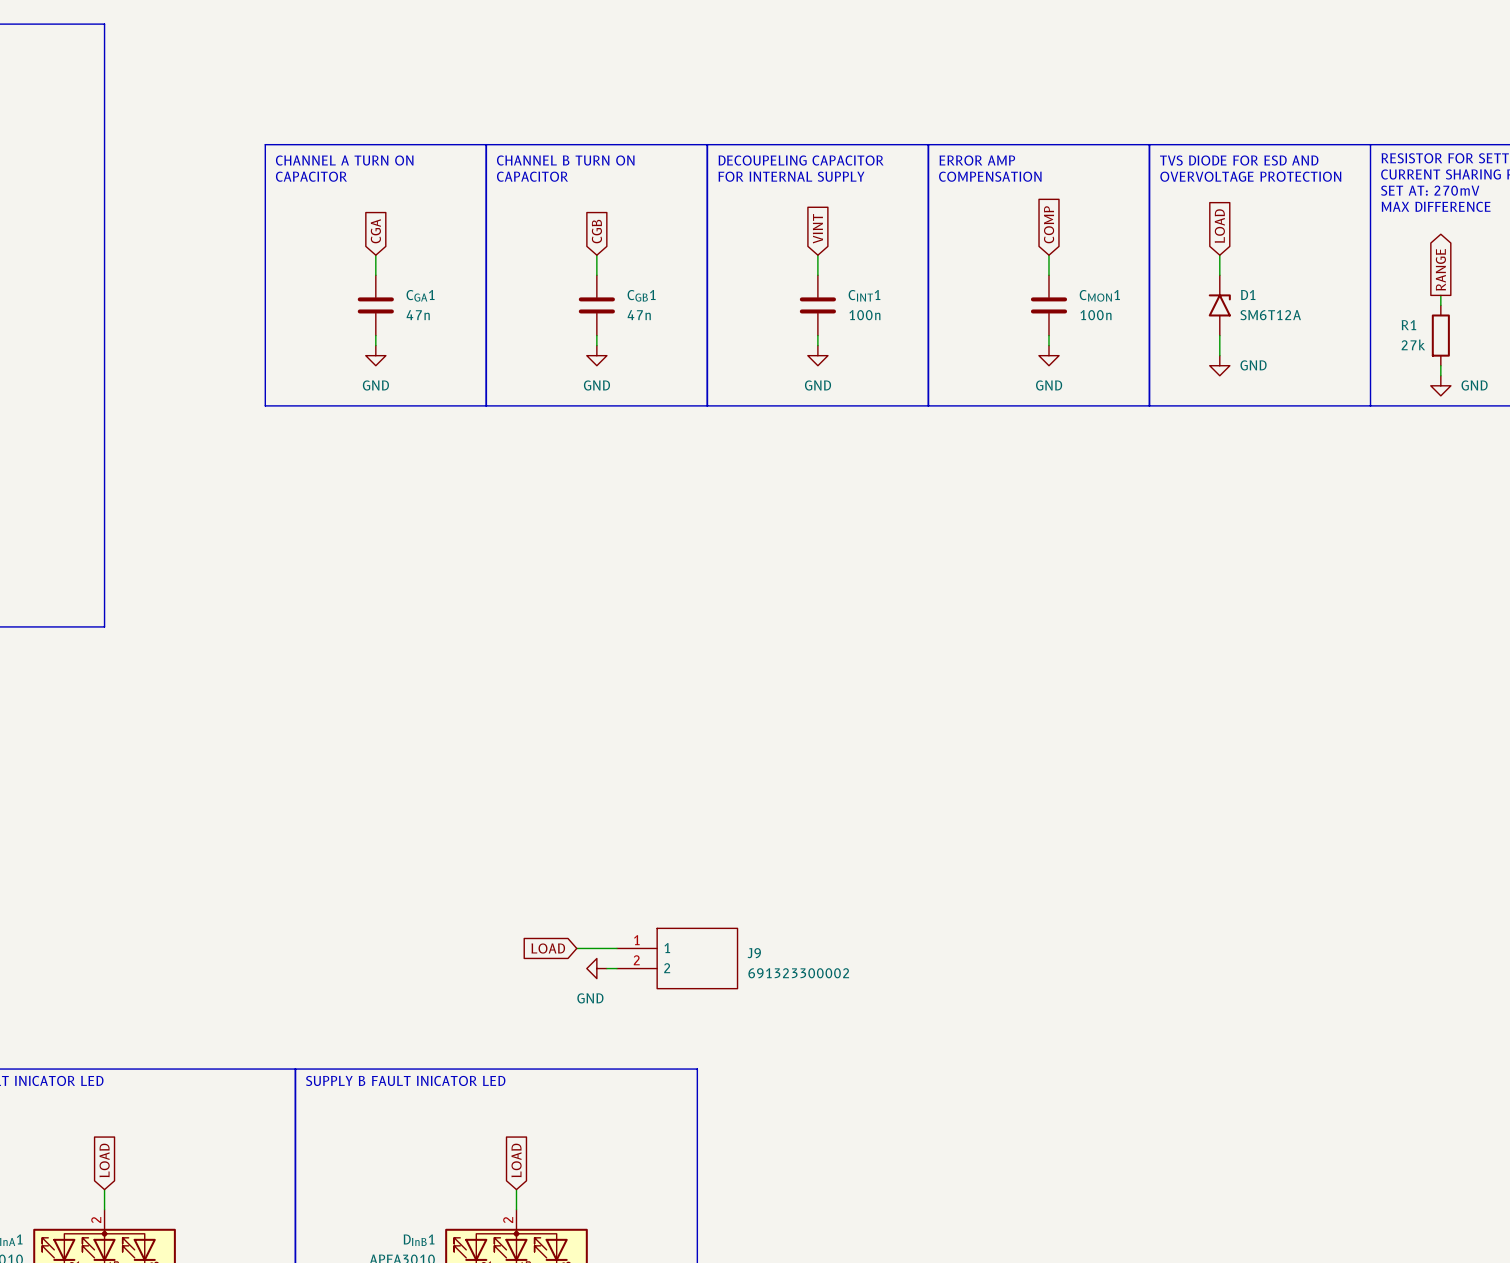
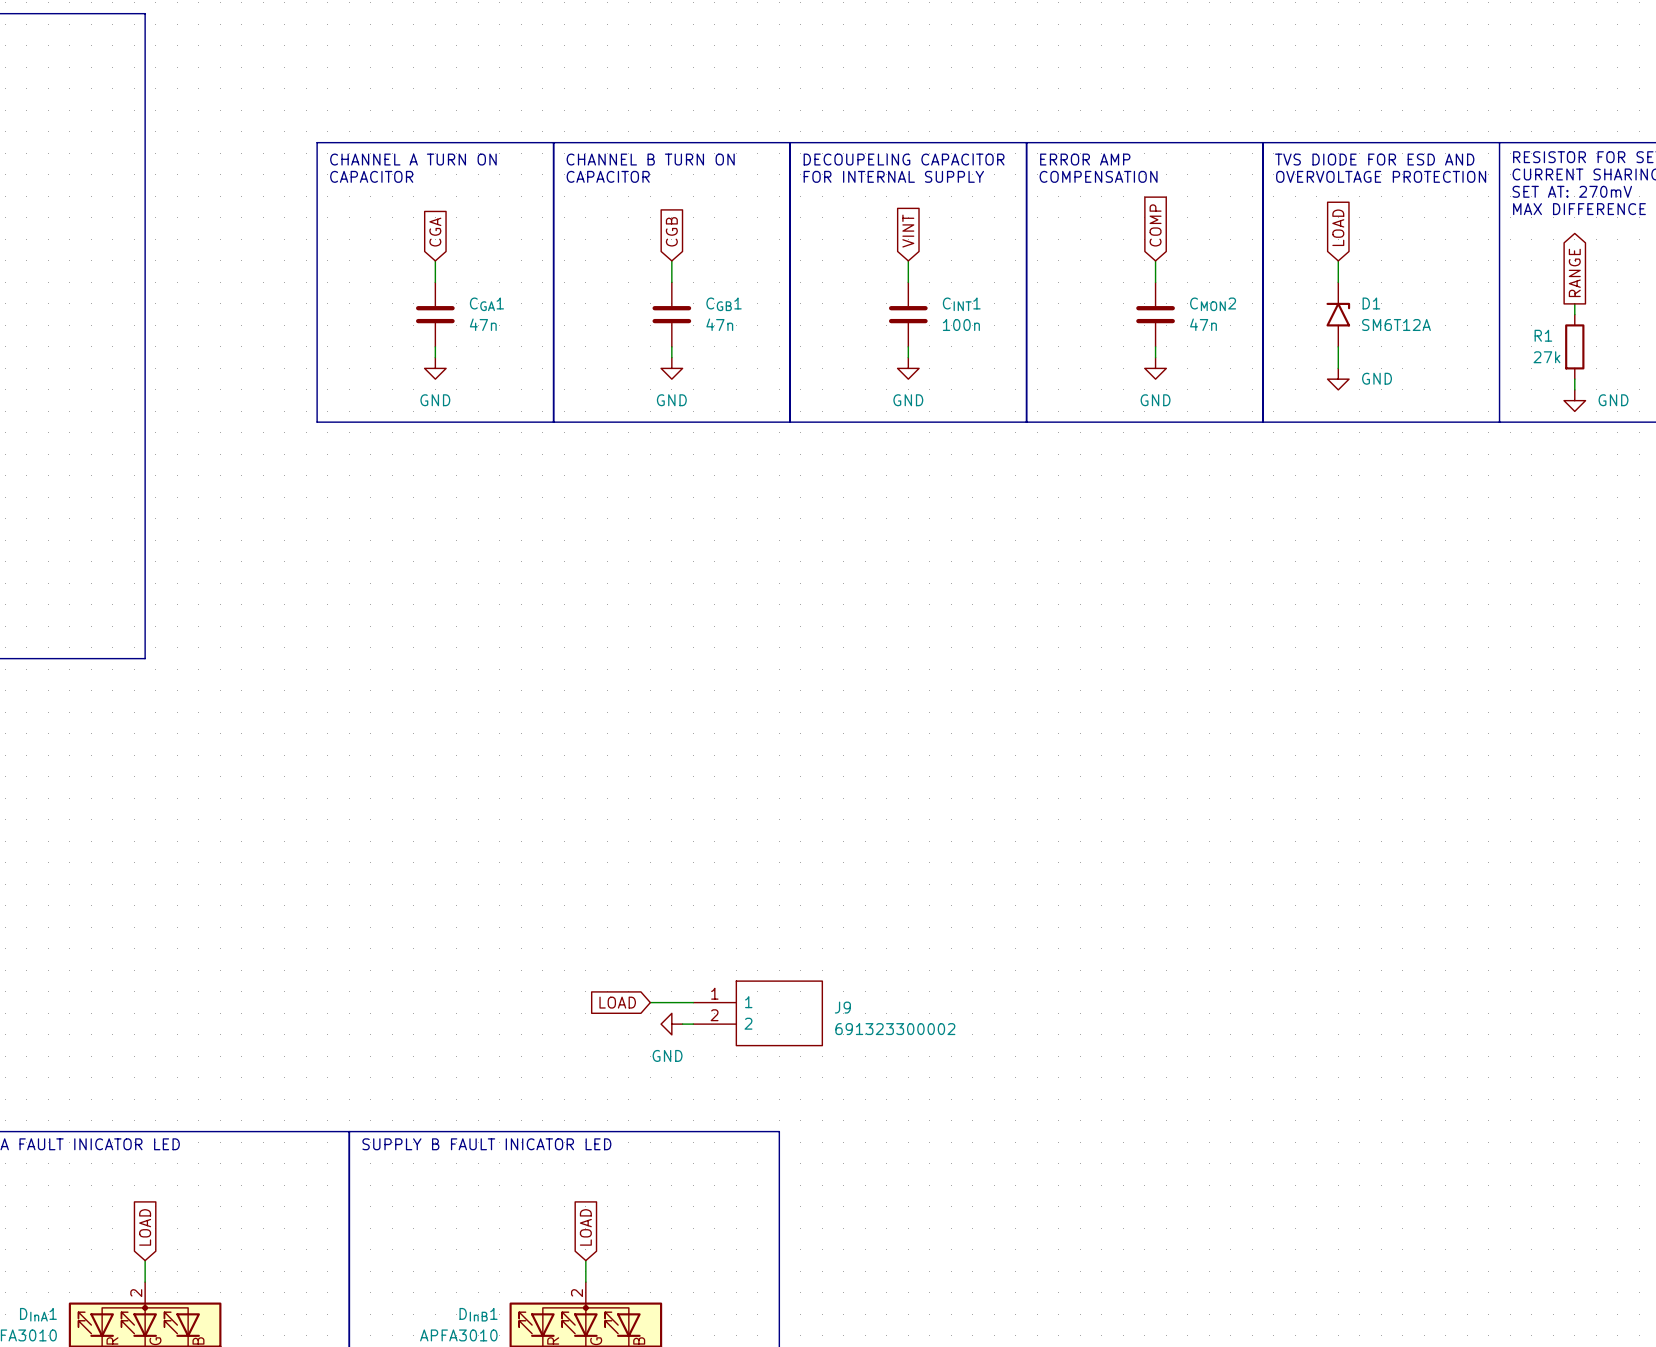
CMON1 name: CMON1 (1099, 295) -> CMON2 (1213, 304)
CMON1 value: 100n (1095, 315) -> 47n (1203, 324)

